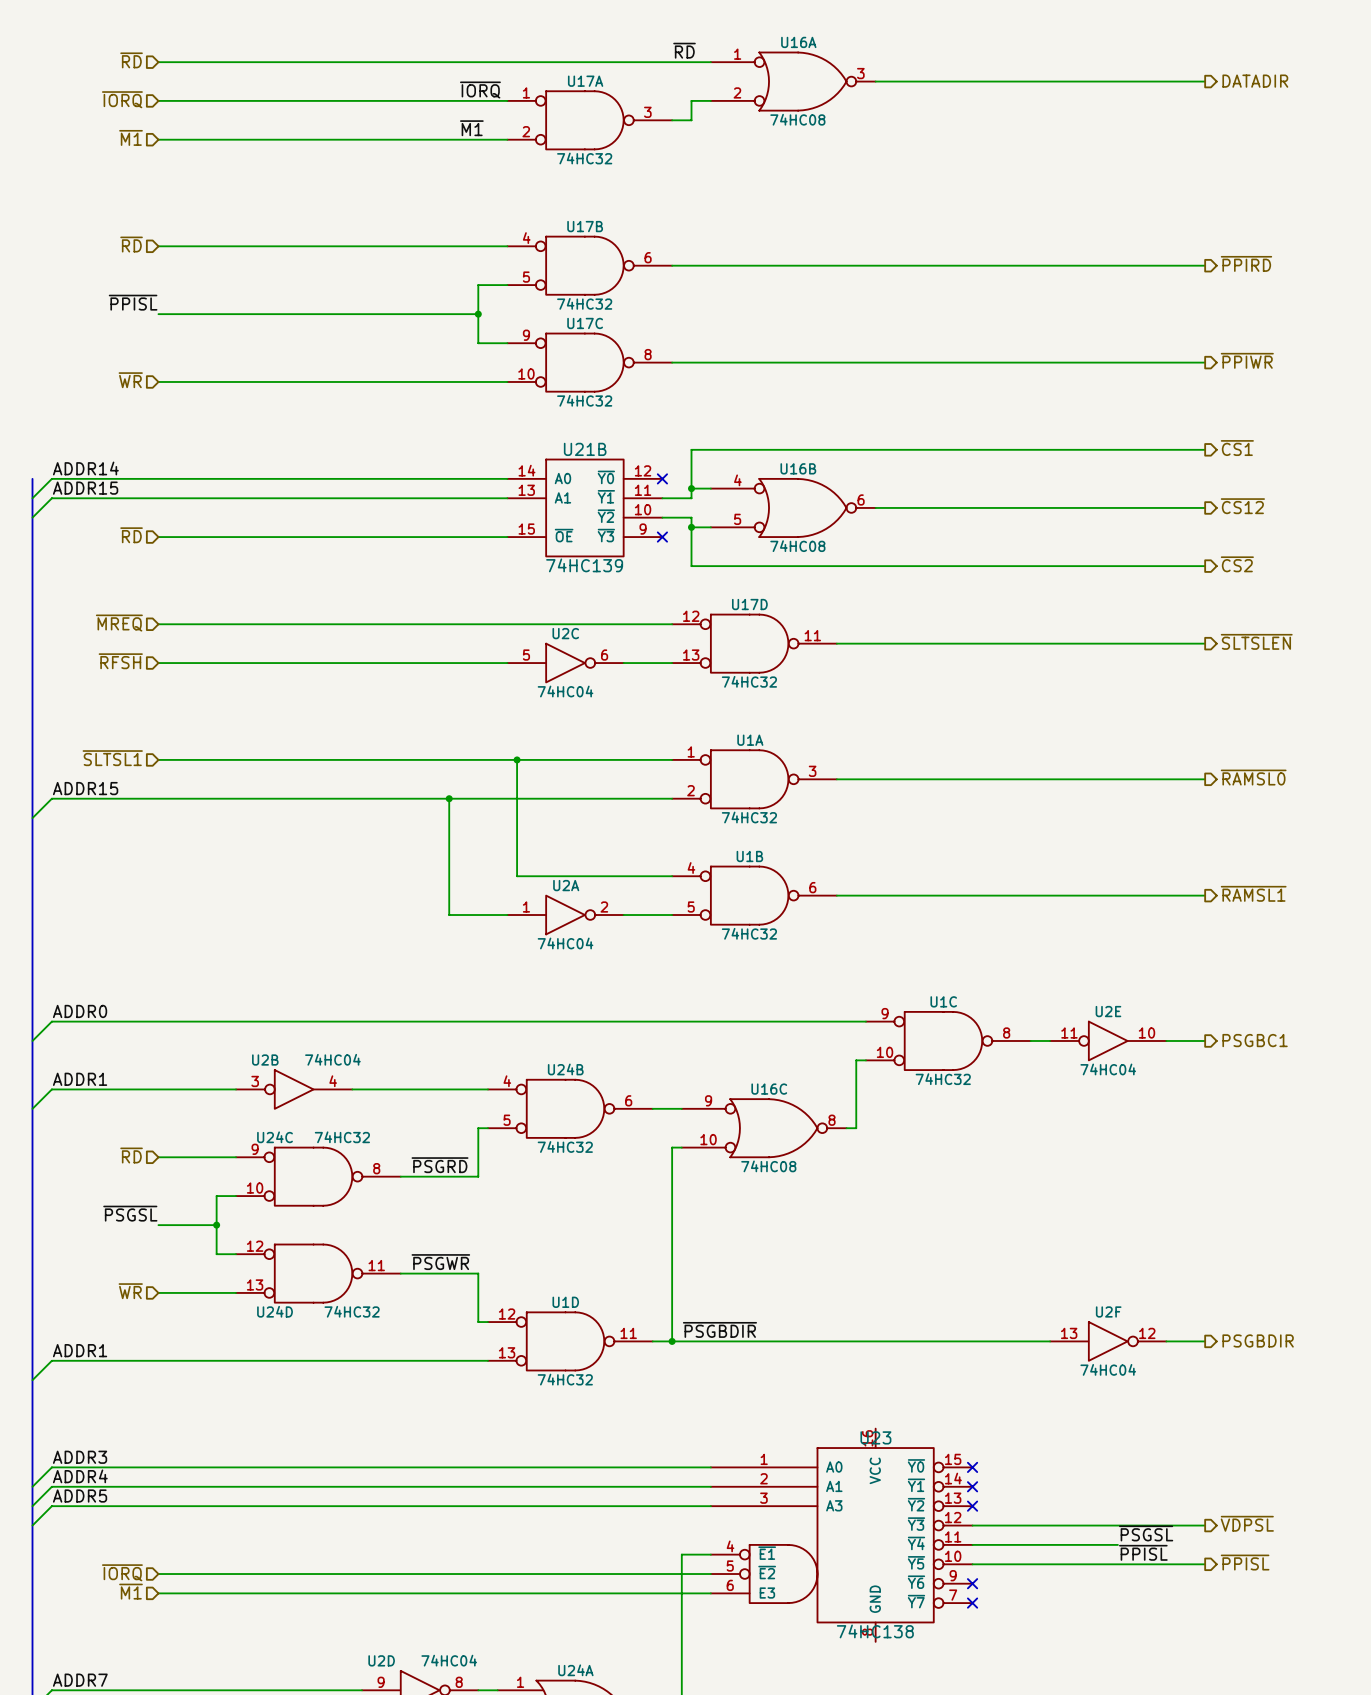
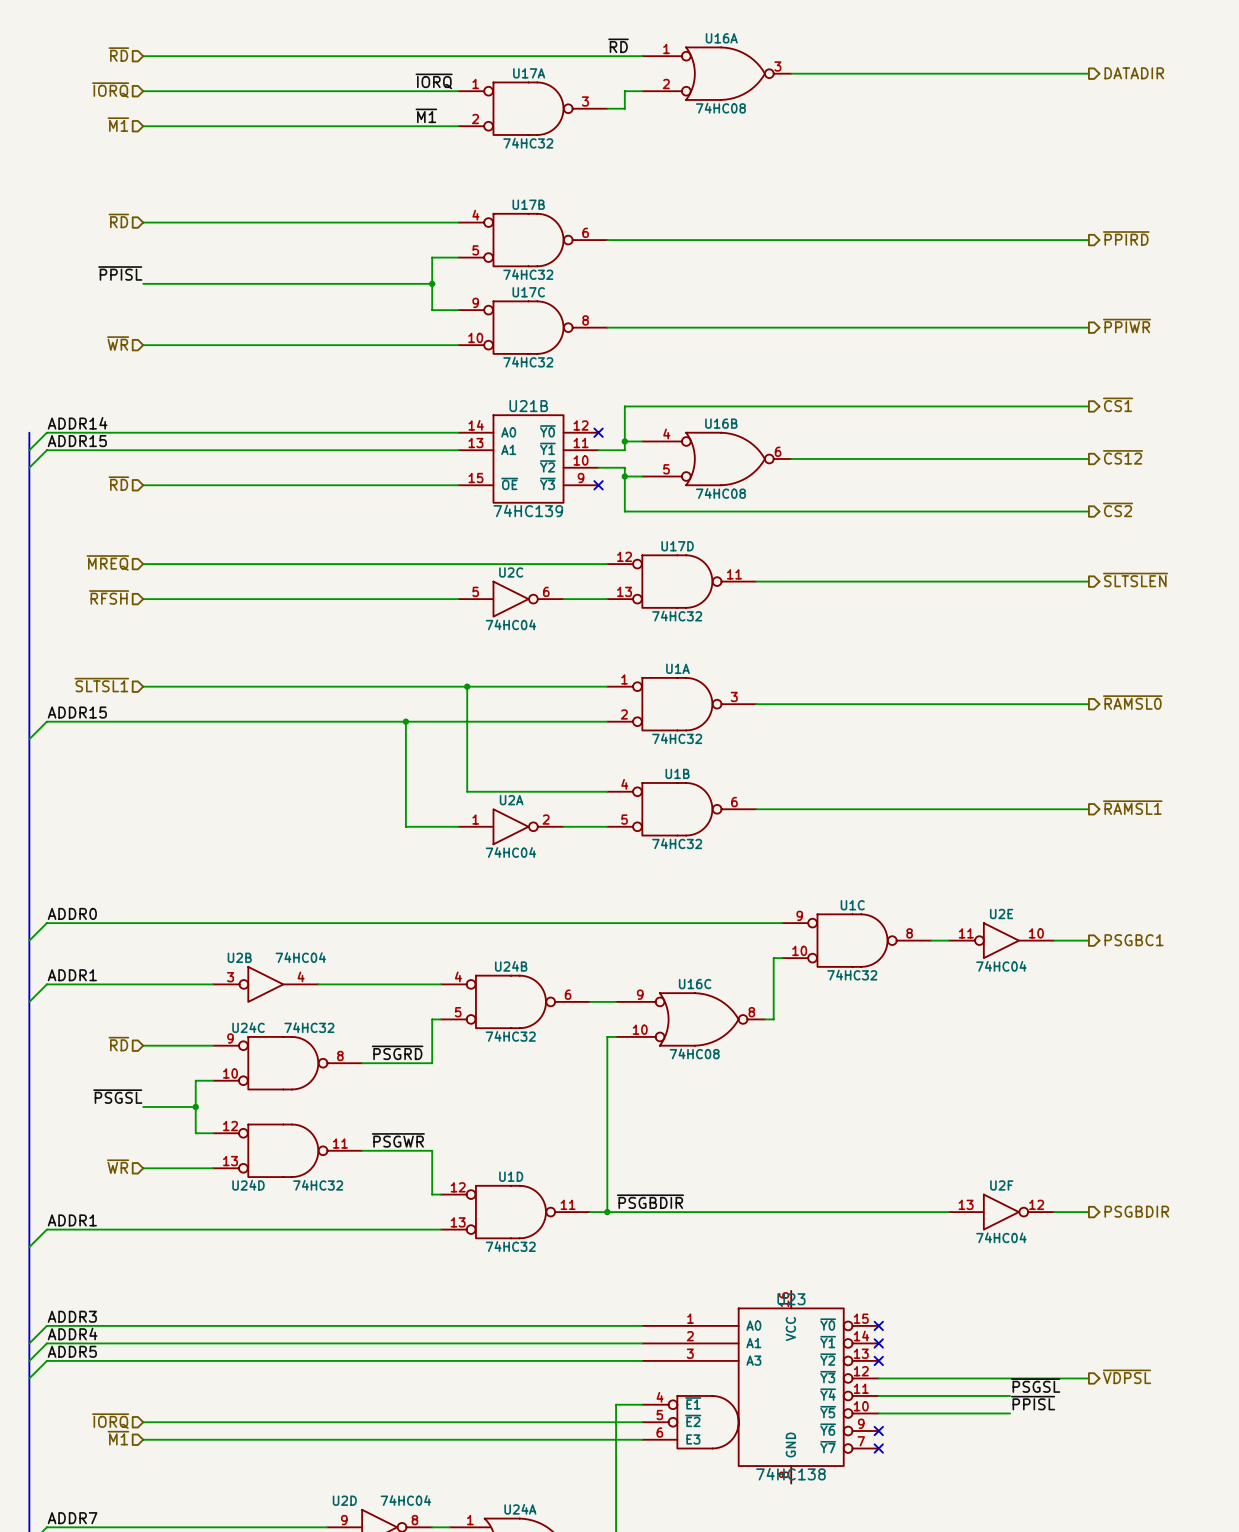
hierarchical label: ~{PPISL} (1245, 1562) -> none
wire: (1117, 1564) (1205, 1564) -> none

